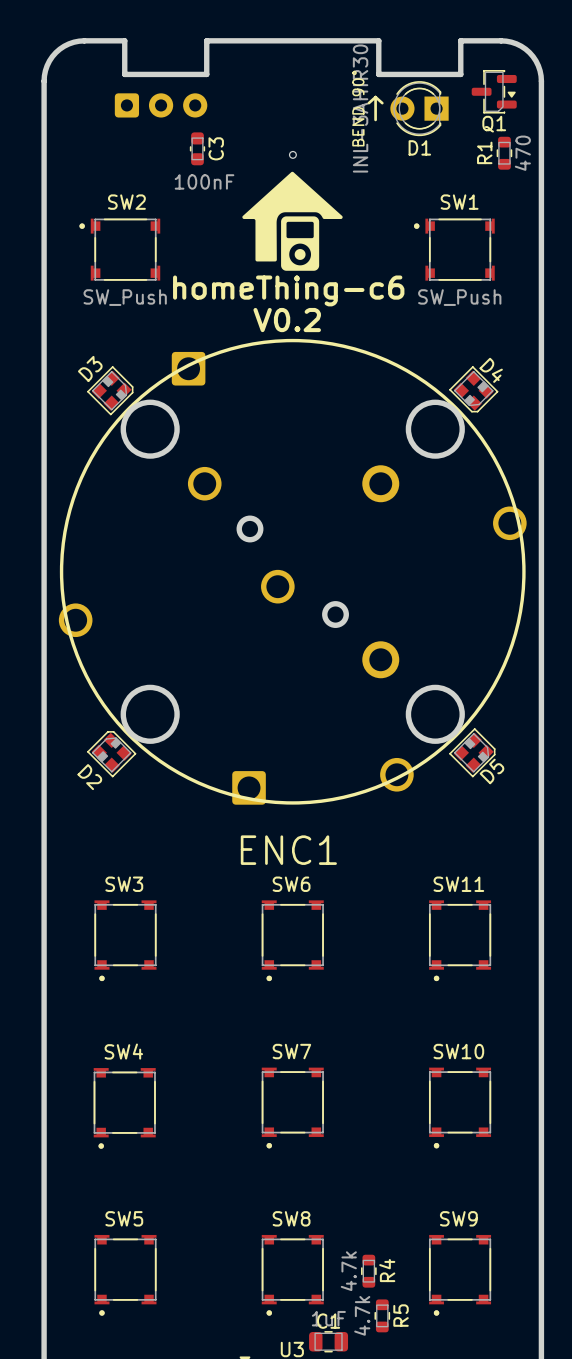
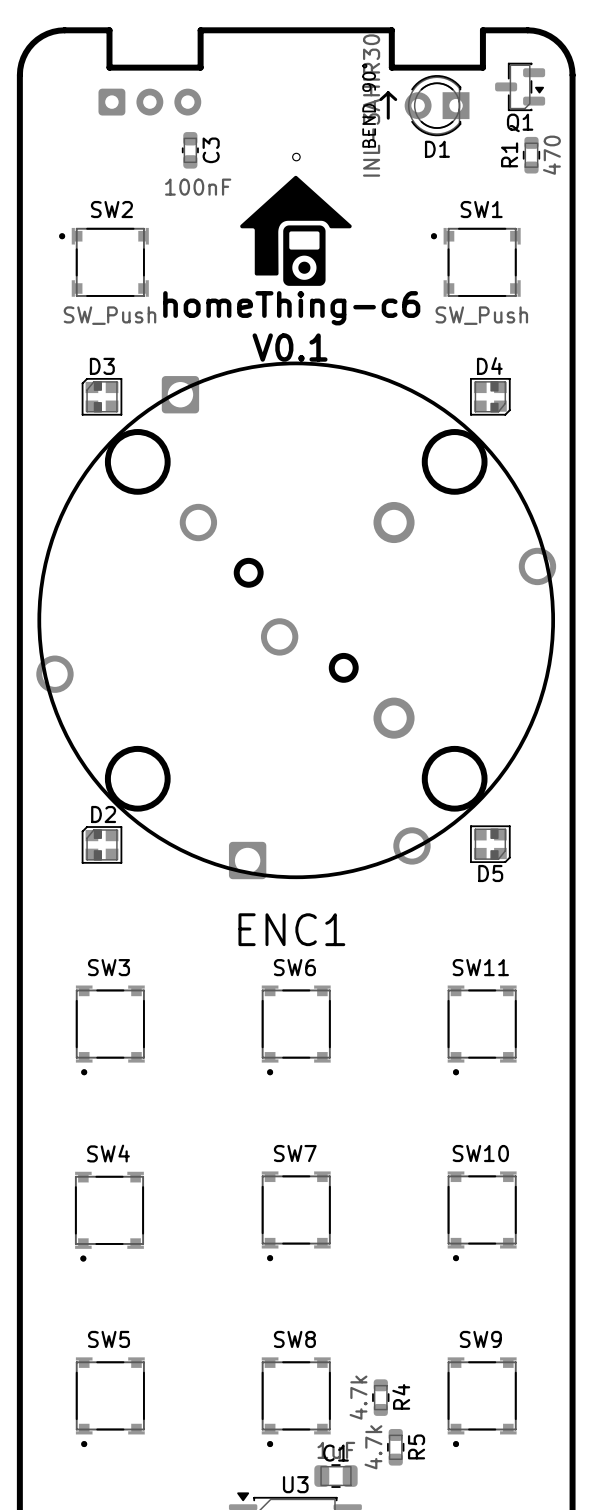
text: V0.2 (287, 320) -> V0.1 (290, 347)
D4 rotation: 0° (473, 389) -> 45° counterclockwise (490, 396)
D3 rotation: 0° (110, 390) -> 135° counterclockwise (101, 396)
D5 rotation: 0° (472, 752) -> 45° clockwise (490, 844)
D2 rotation: 0° (111, 754) -> 45° counterclockwise (101, 844)
D2 name position: D2 (89, 777) -> D2 (103, 814)

